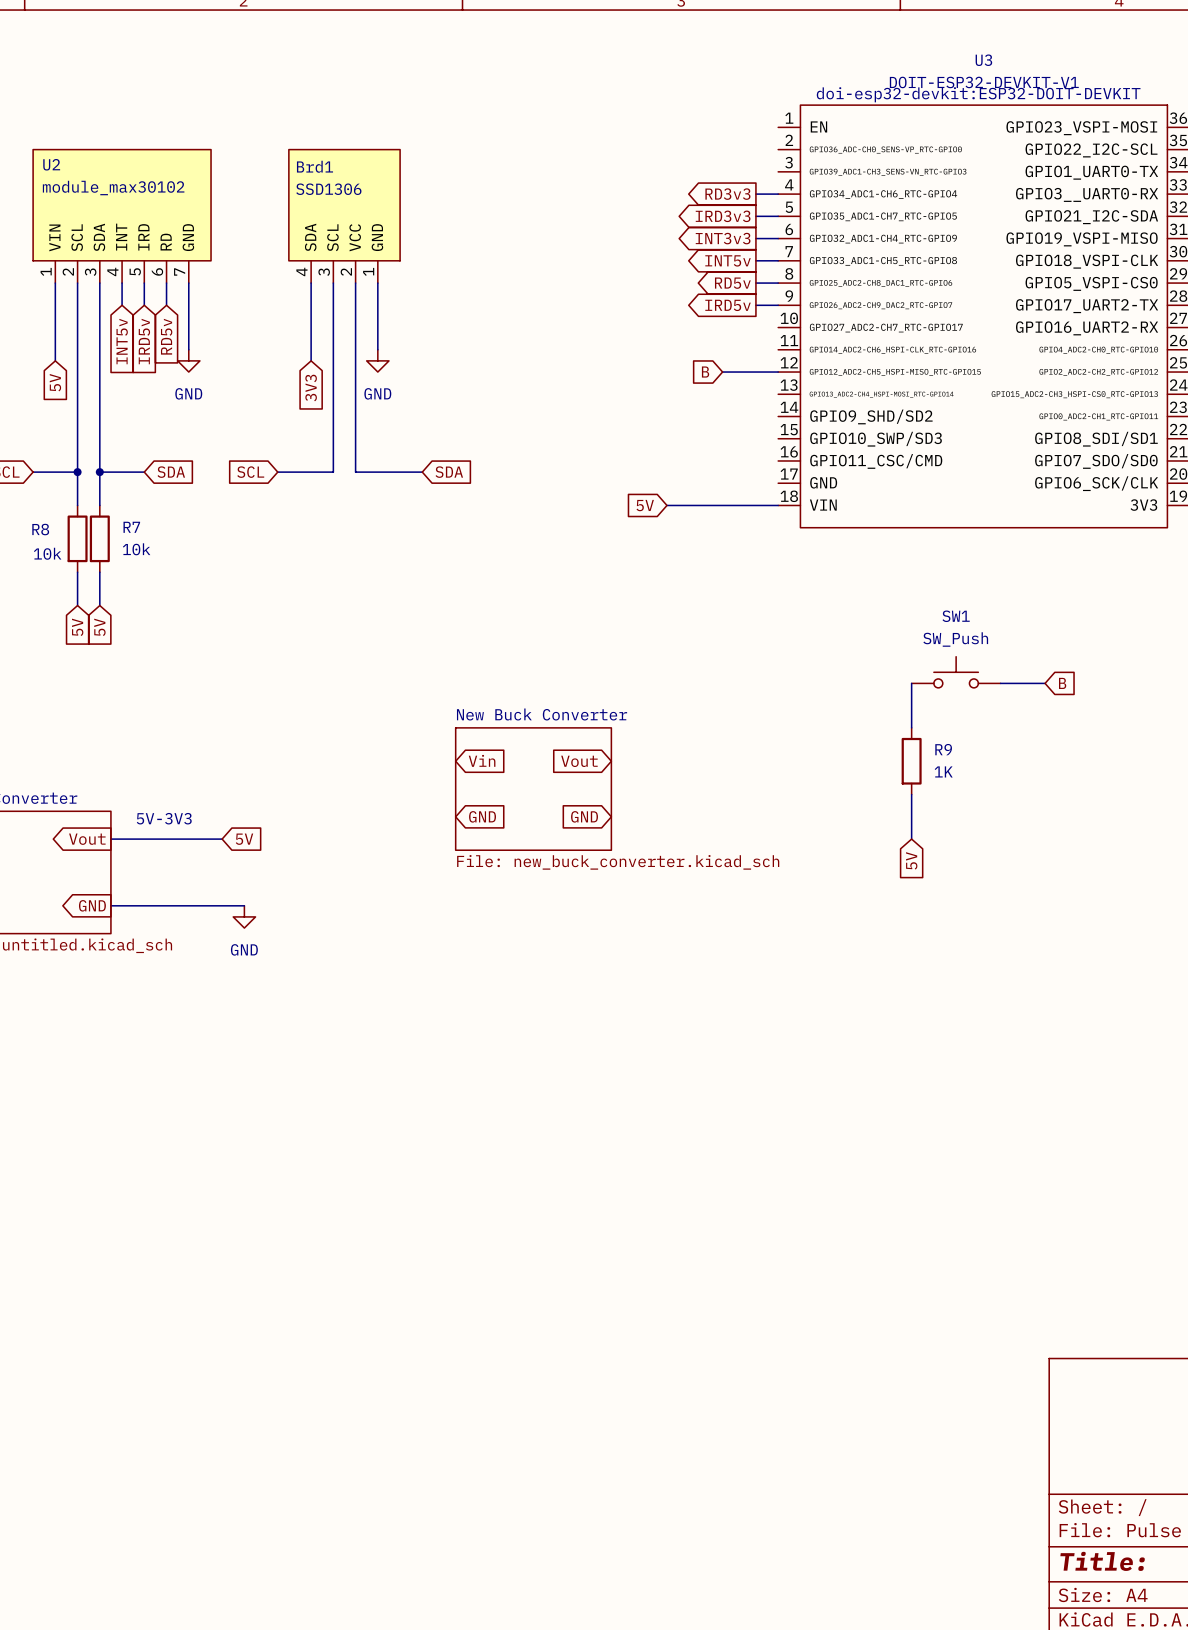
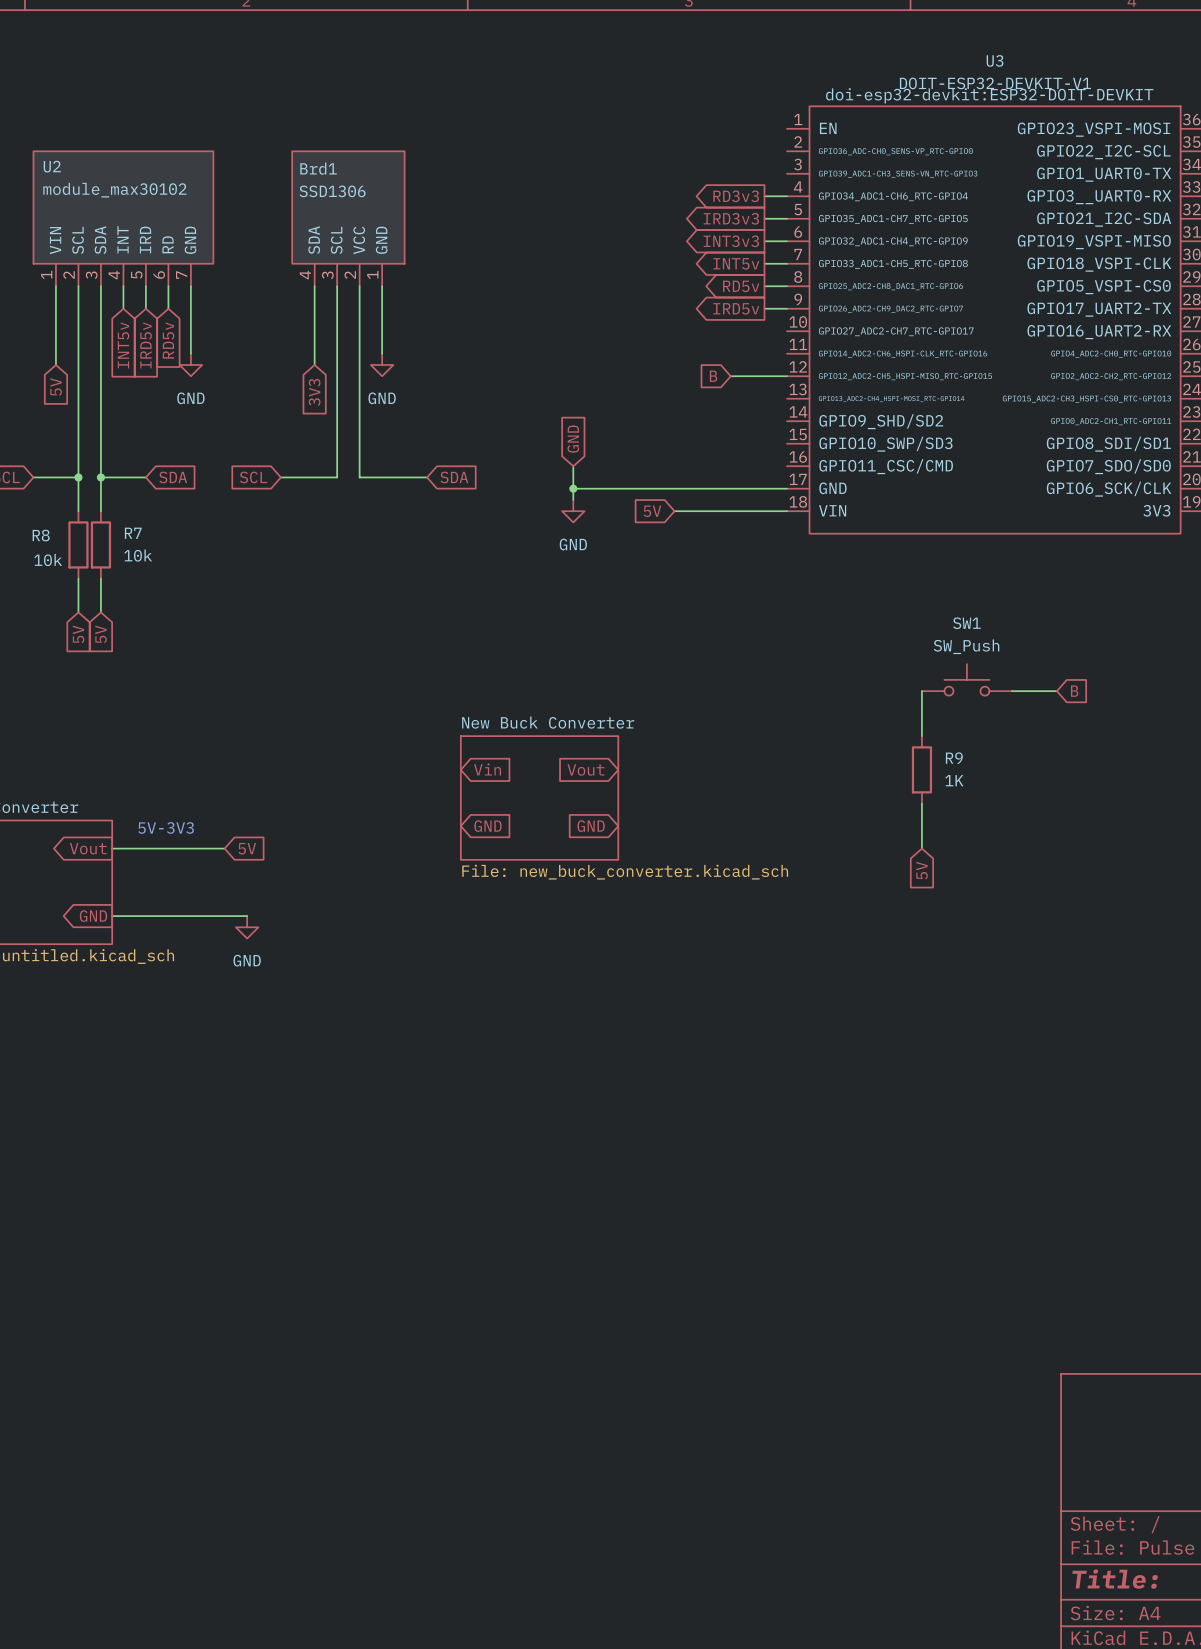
global label: none -> GND (573, 439)
wire: none -> (573, 466) (573, 499)
wire: none -> (573, 488) (787, 488)
junction: none -> (573, 488)
power symbol: none -> GND (573, 511)

